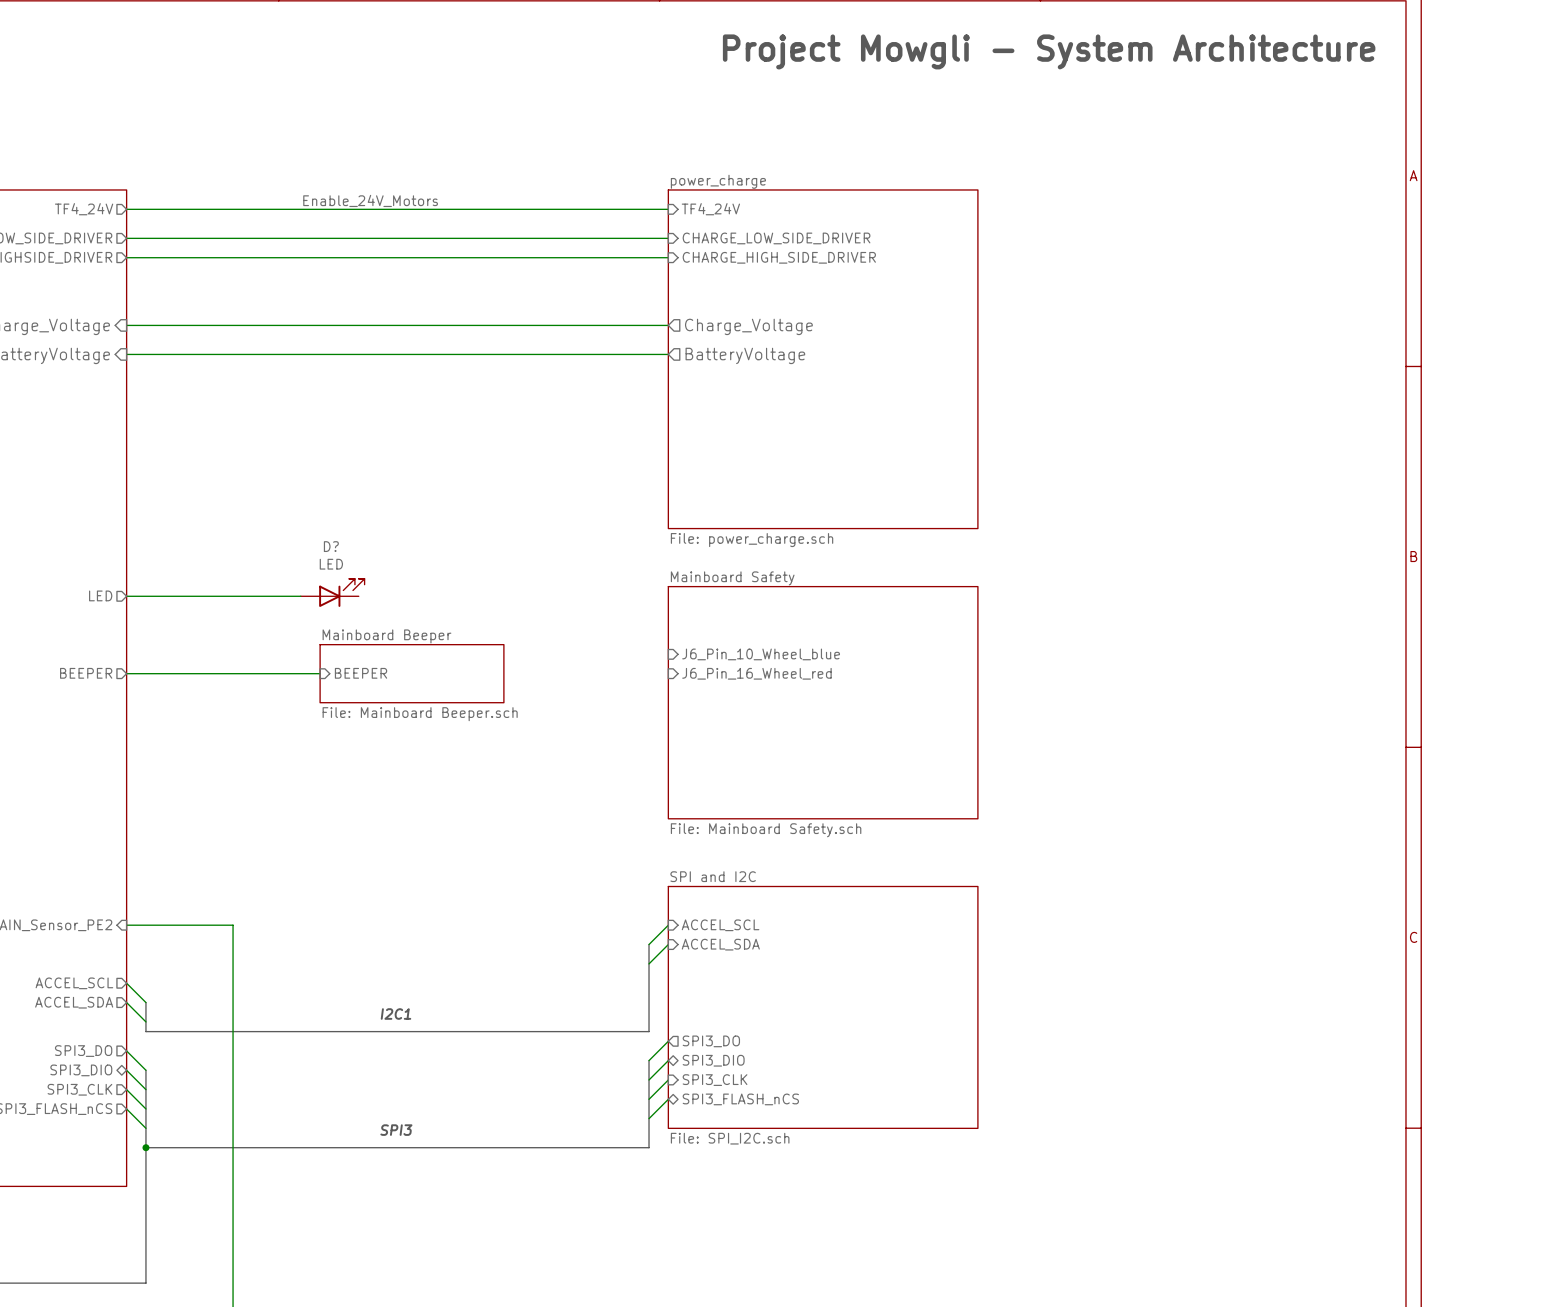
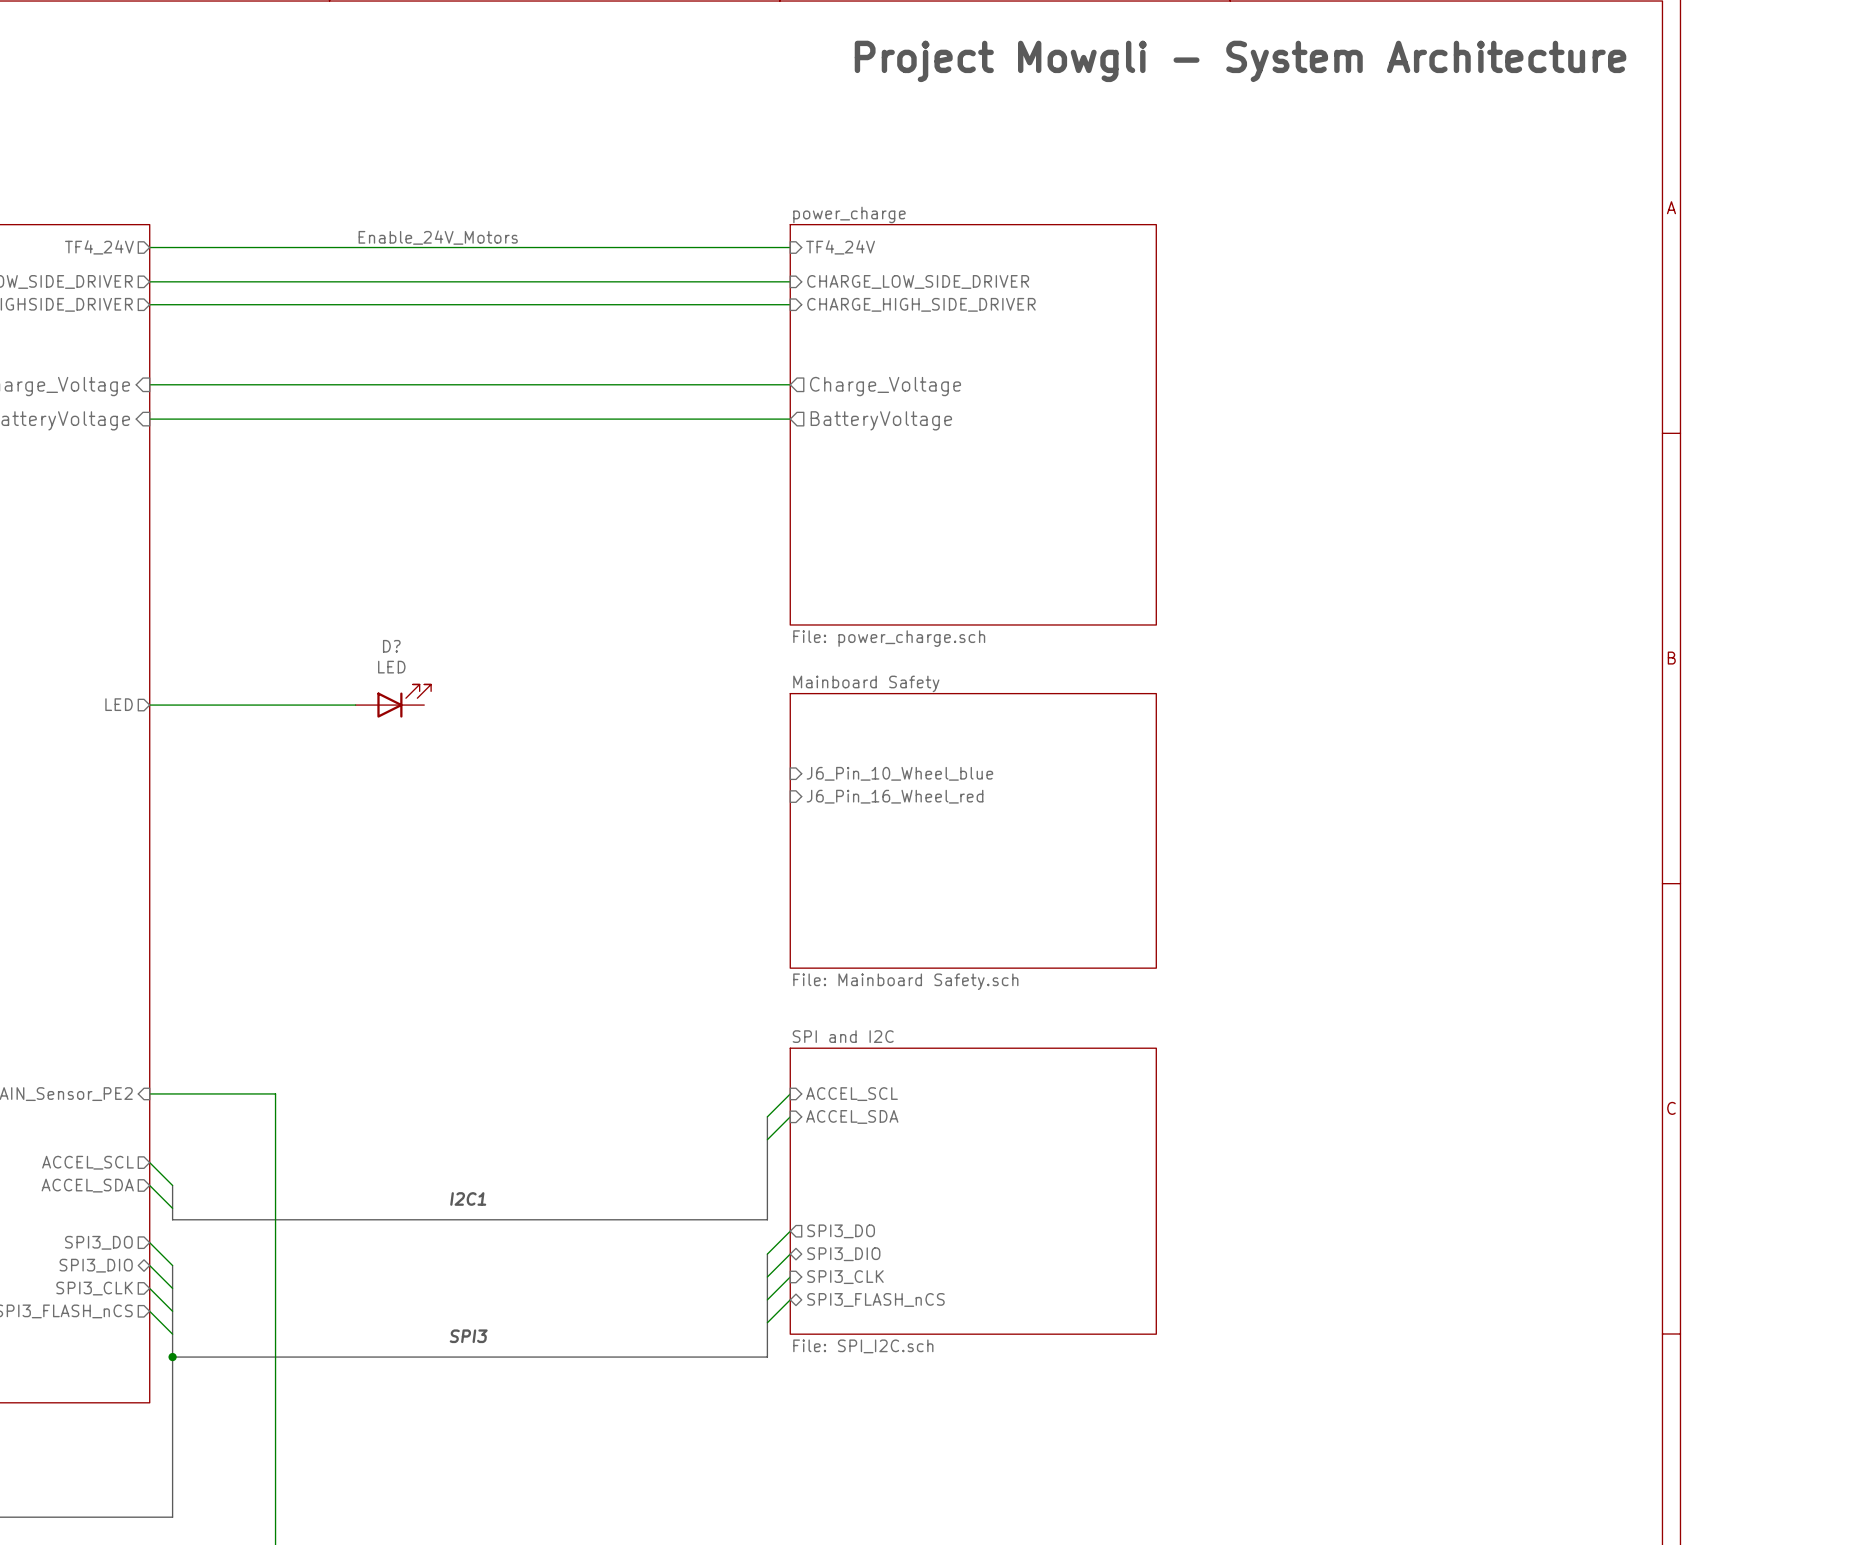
sheet pin: BEEPER (86, 673) -> none
wire: (126, 673) (320, 673) -> none
sheet pin: BEEPER (361, 673) -> none
sheet Mainboard Beeper: File: Mainboard Beeper.sch (412, 673) -> none

